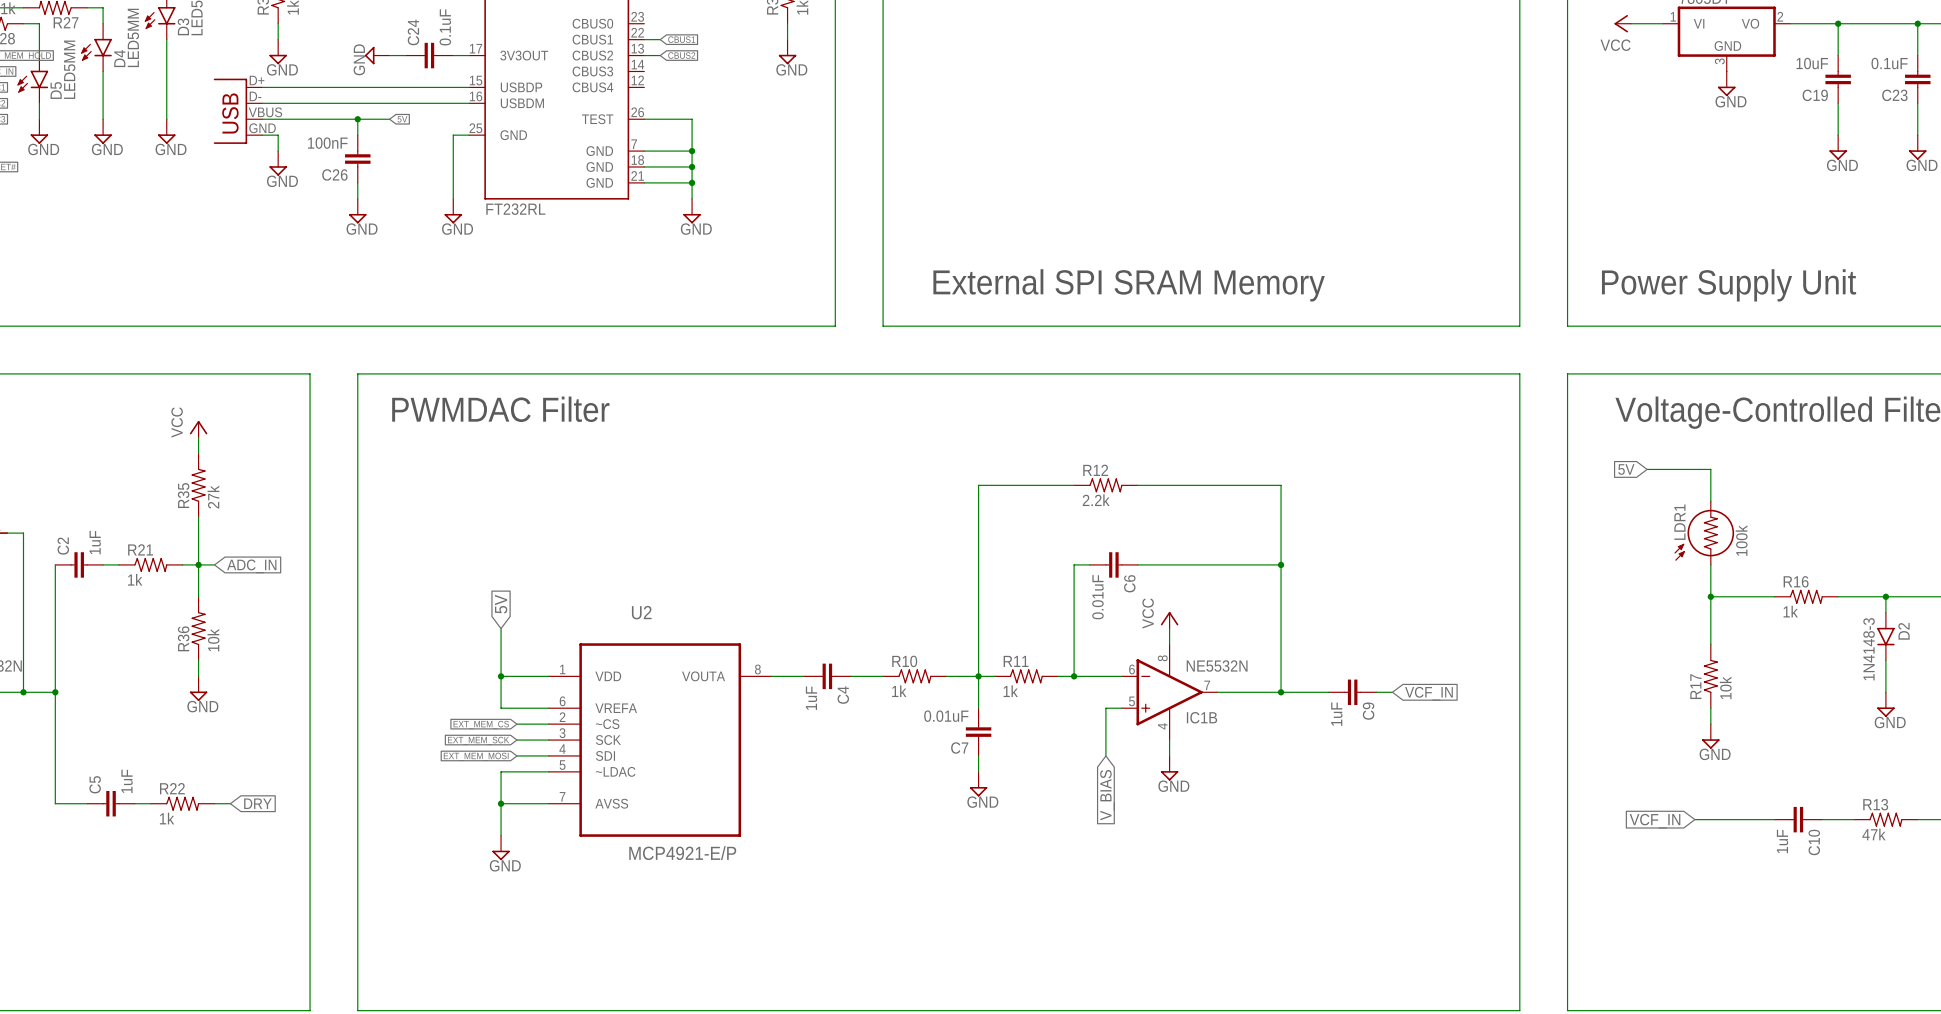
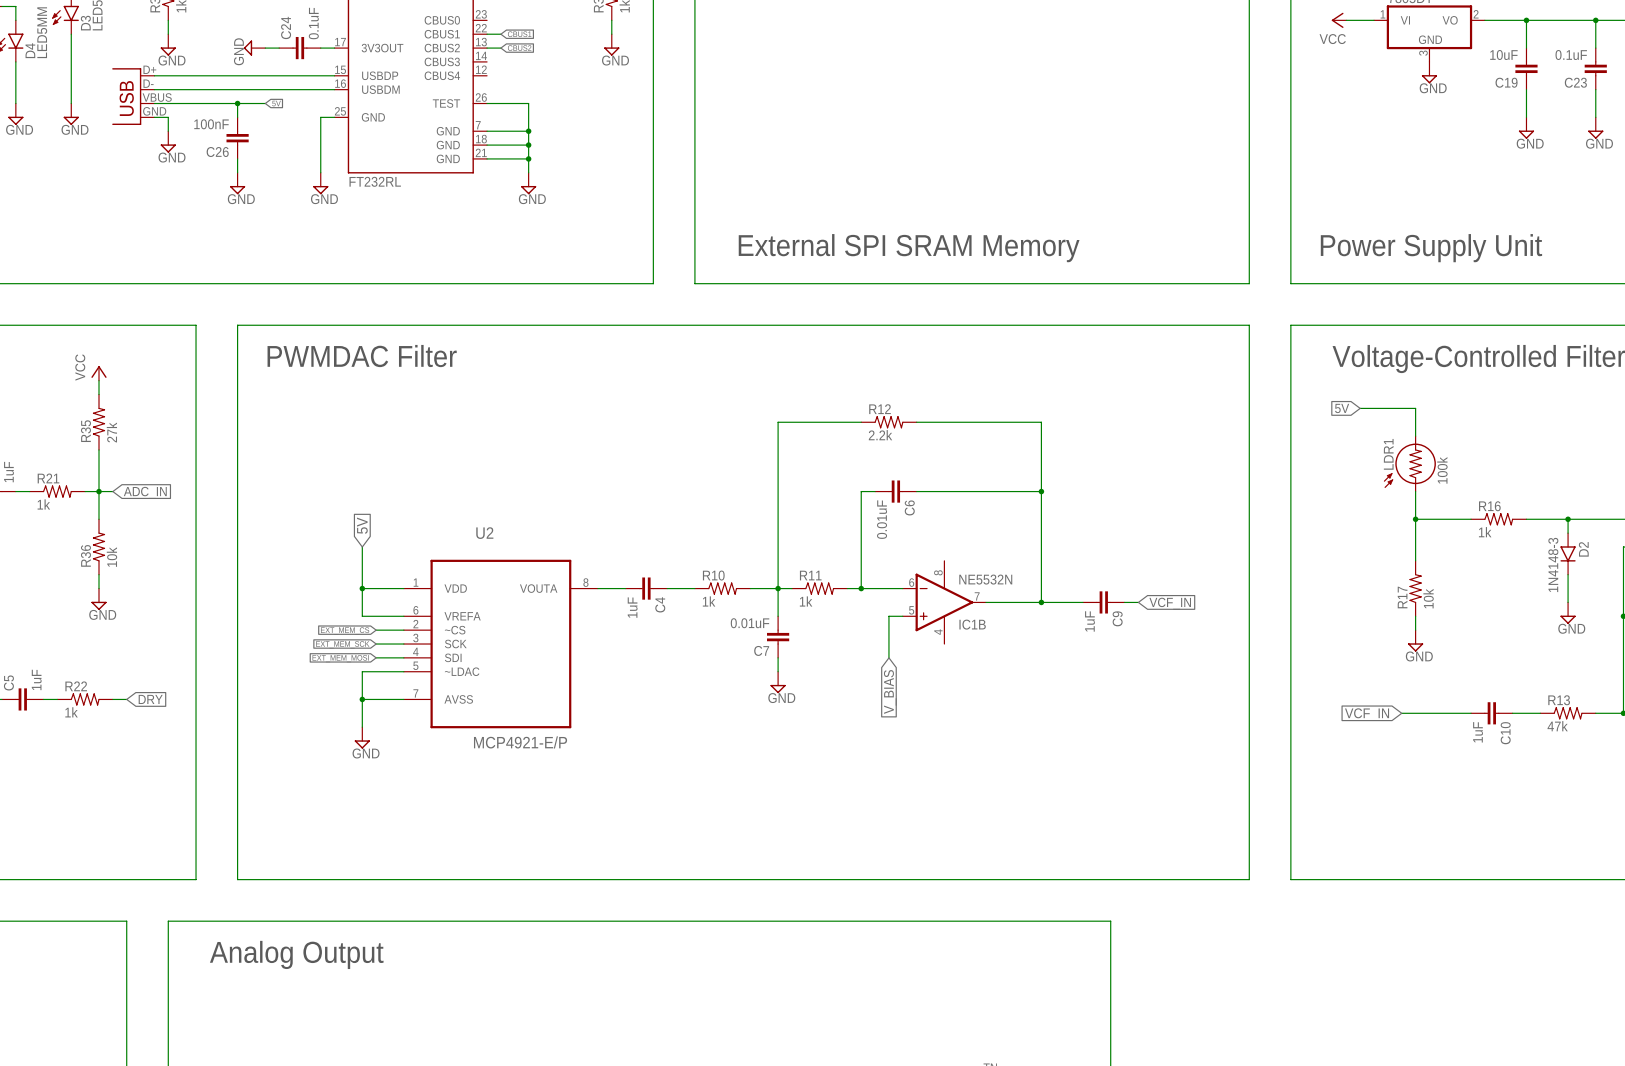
power symbol: VCC (1169, 620) -> none
wire: (1169, 628) (1169, 644) -> none
wire: (1169, 740) (1169, 755) -> none
power symbol: GND (1169, 768) -> none

